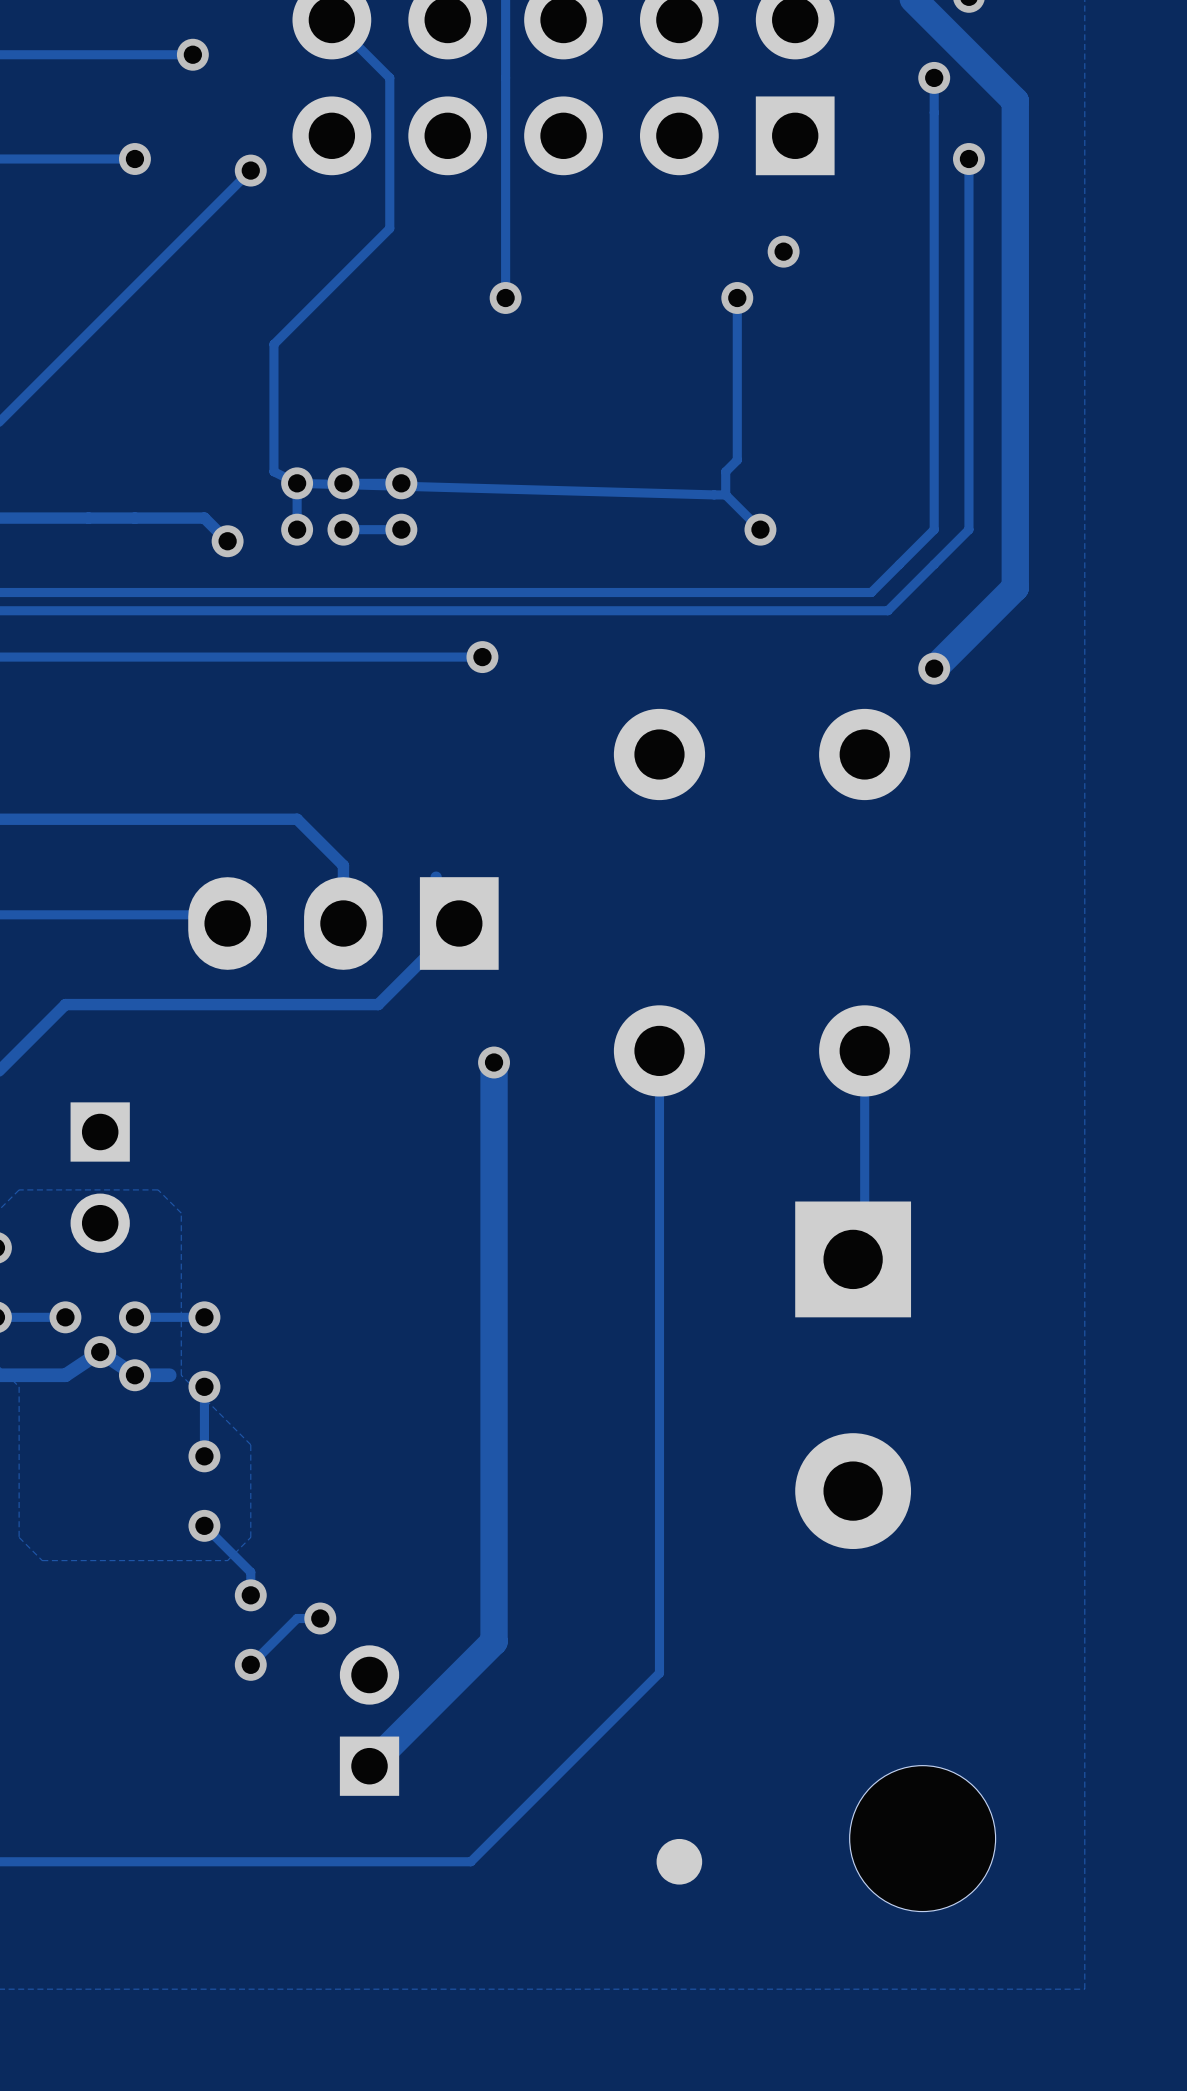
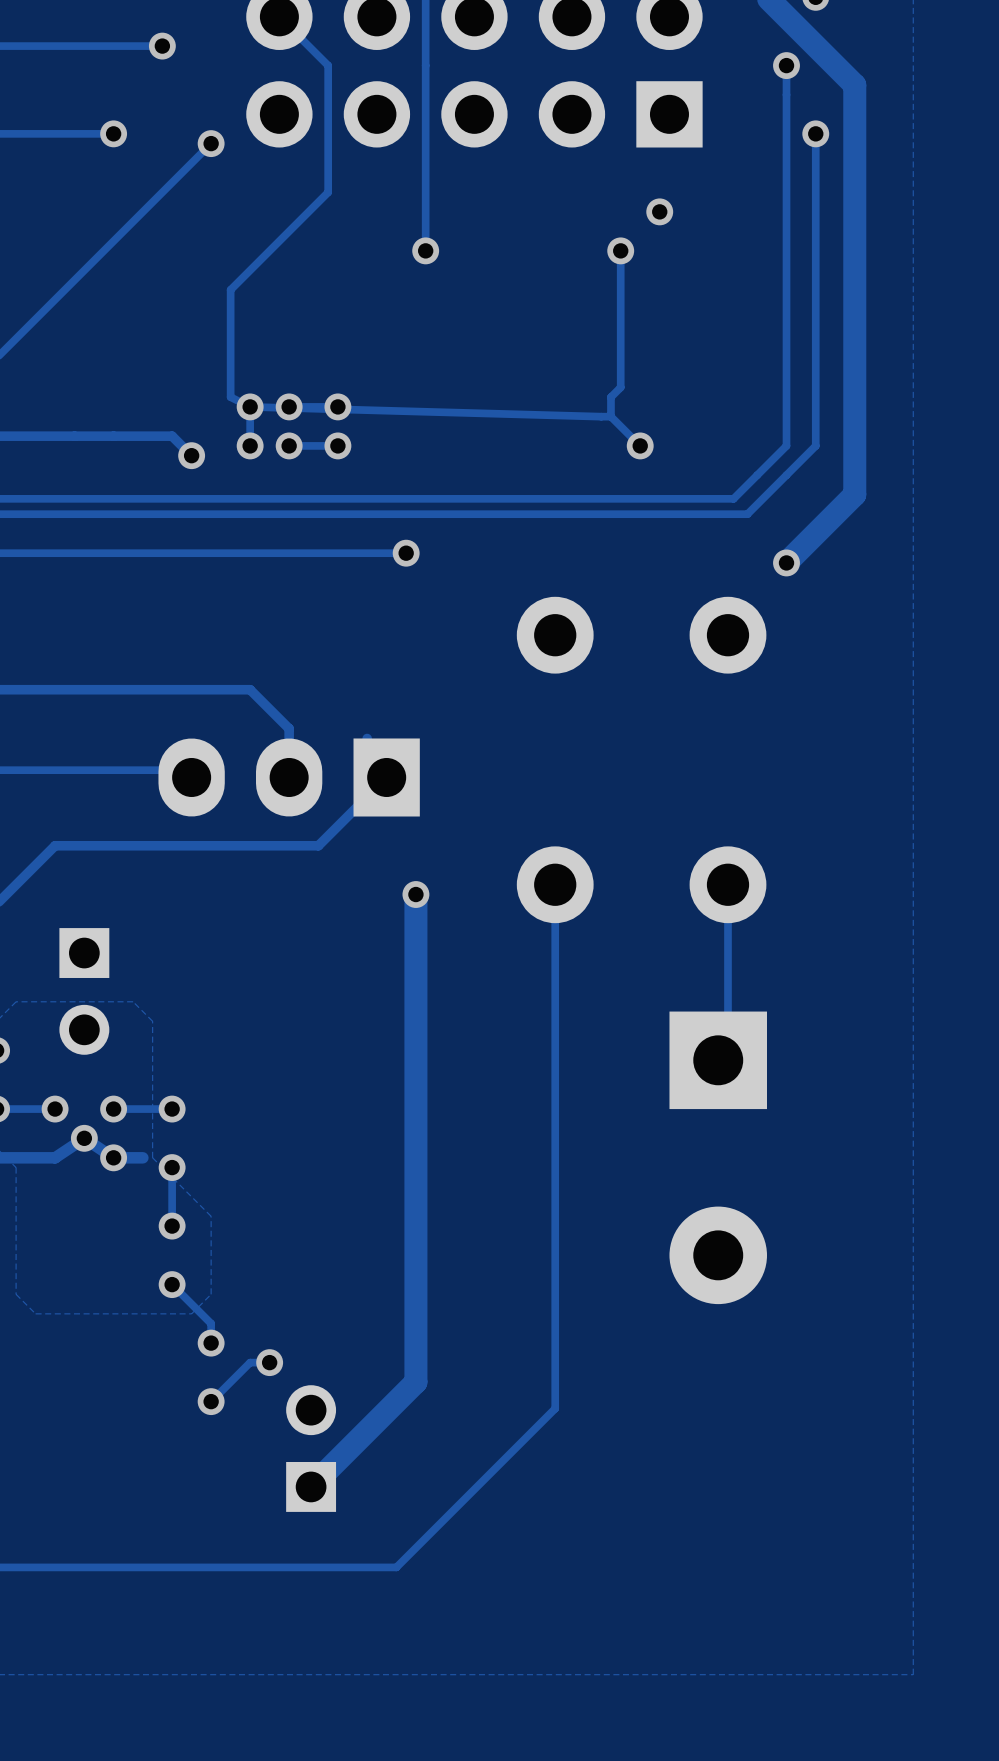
part: (922, 1838) -> none
part: (679, 1861) -> none

